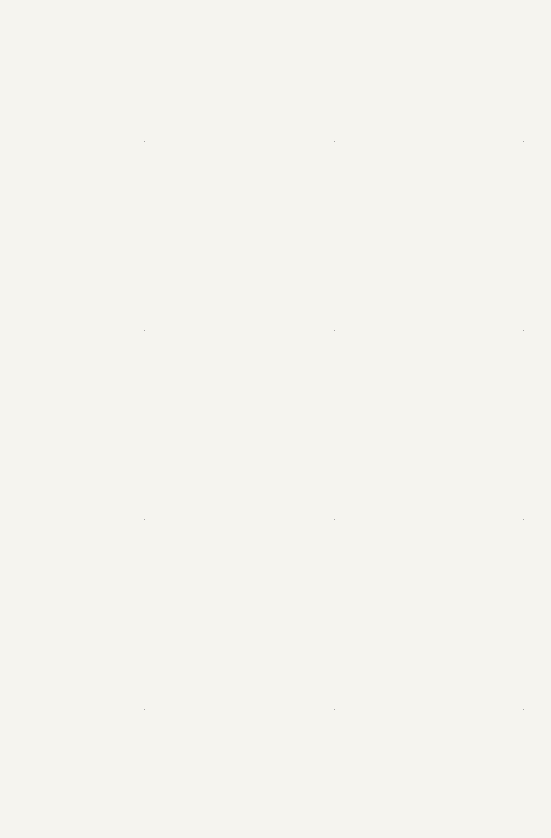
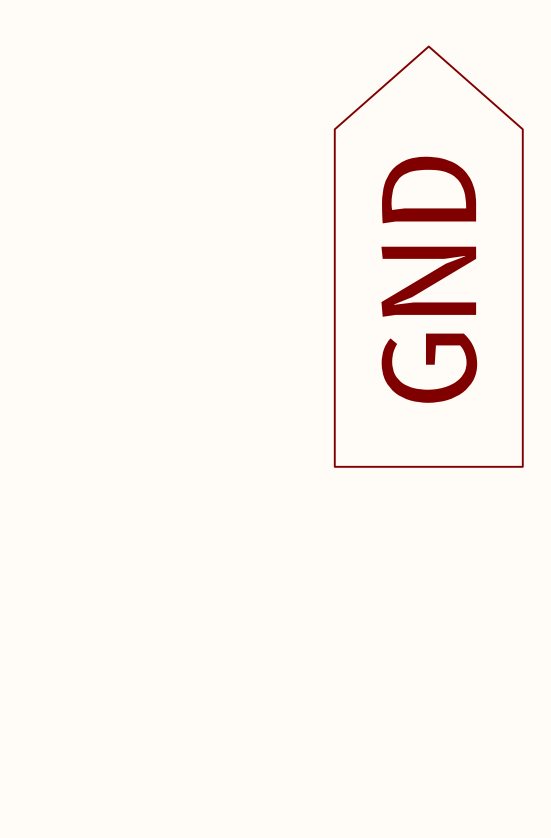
global label: none -> GND (429, 279)

